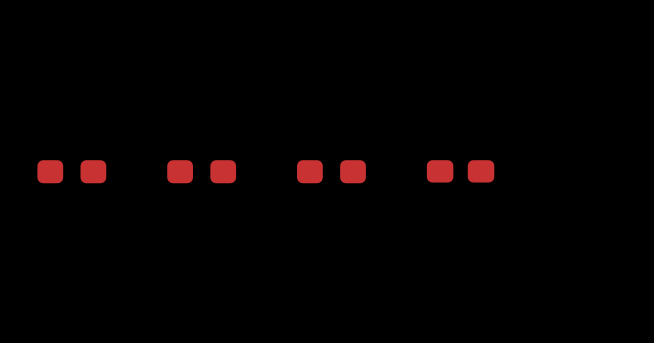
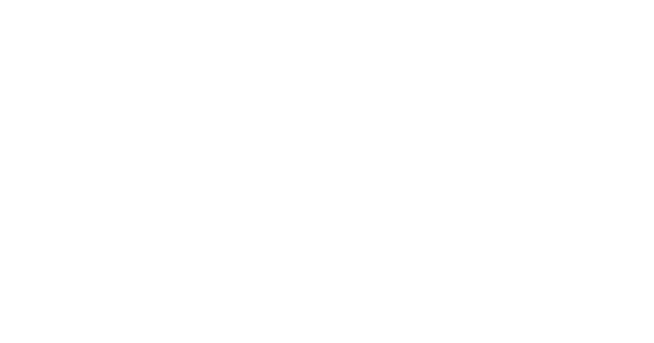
part: (71, 171) -> none
part: (201, 171) -> none
part: (331, 171) -> none
part: (460, 171) -> none

